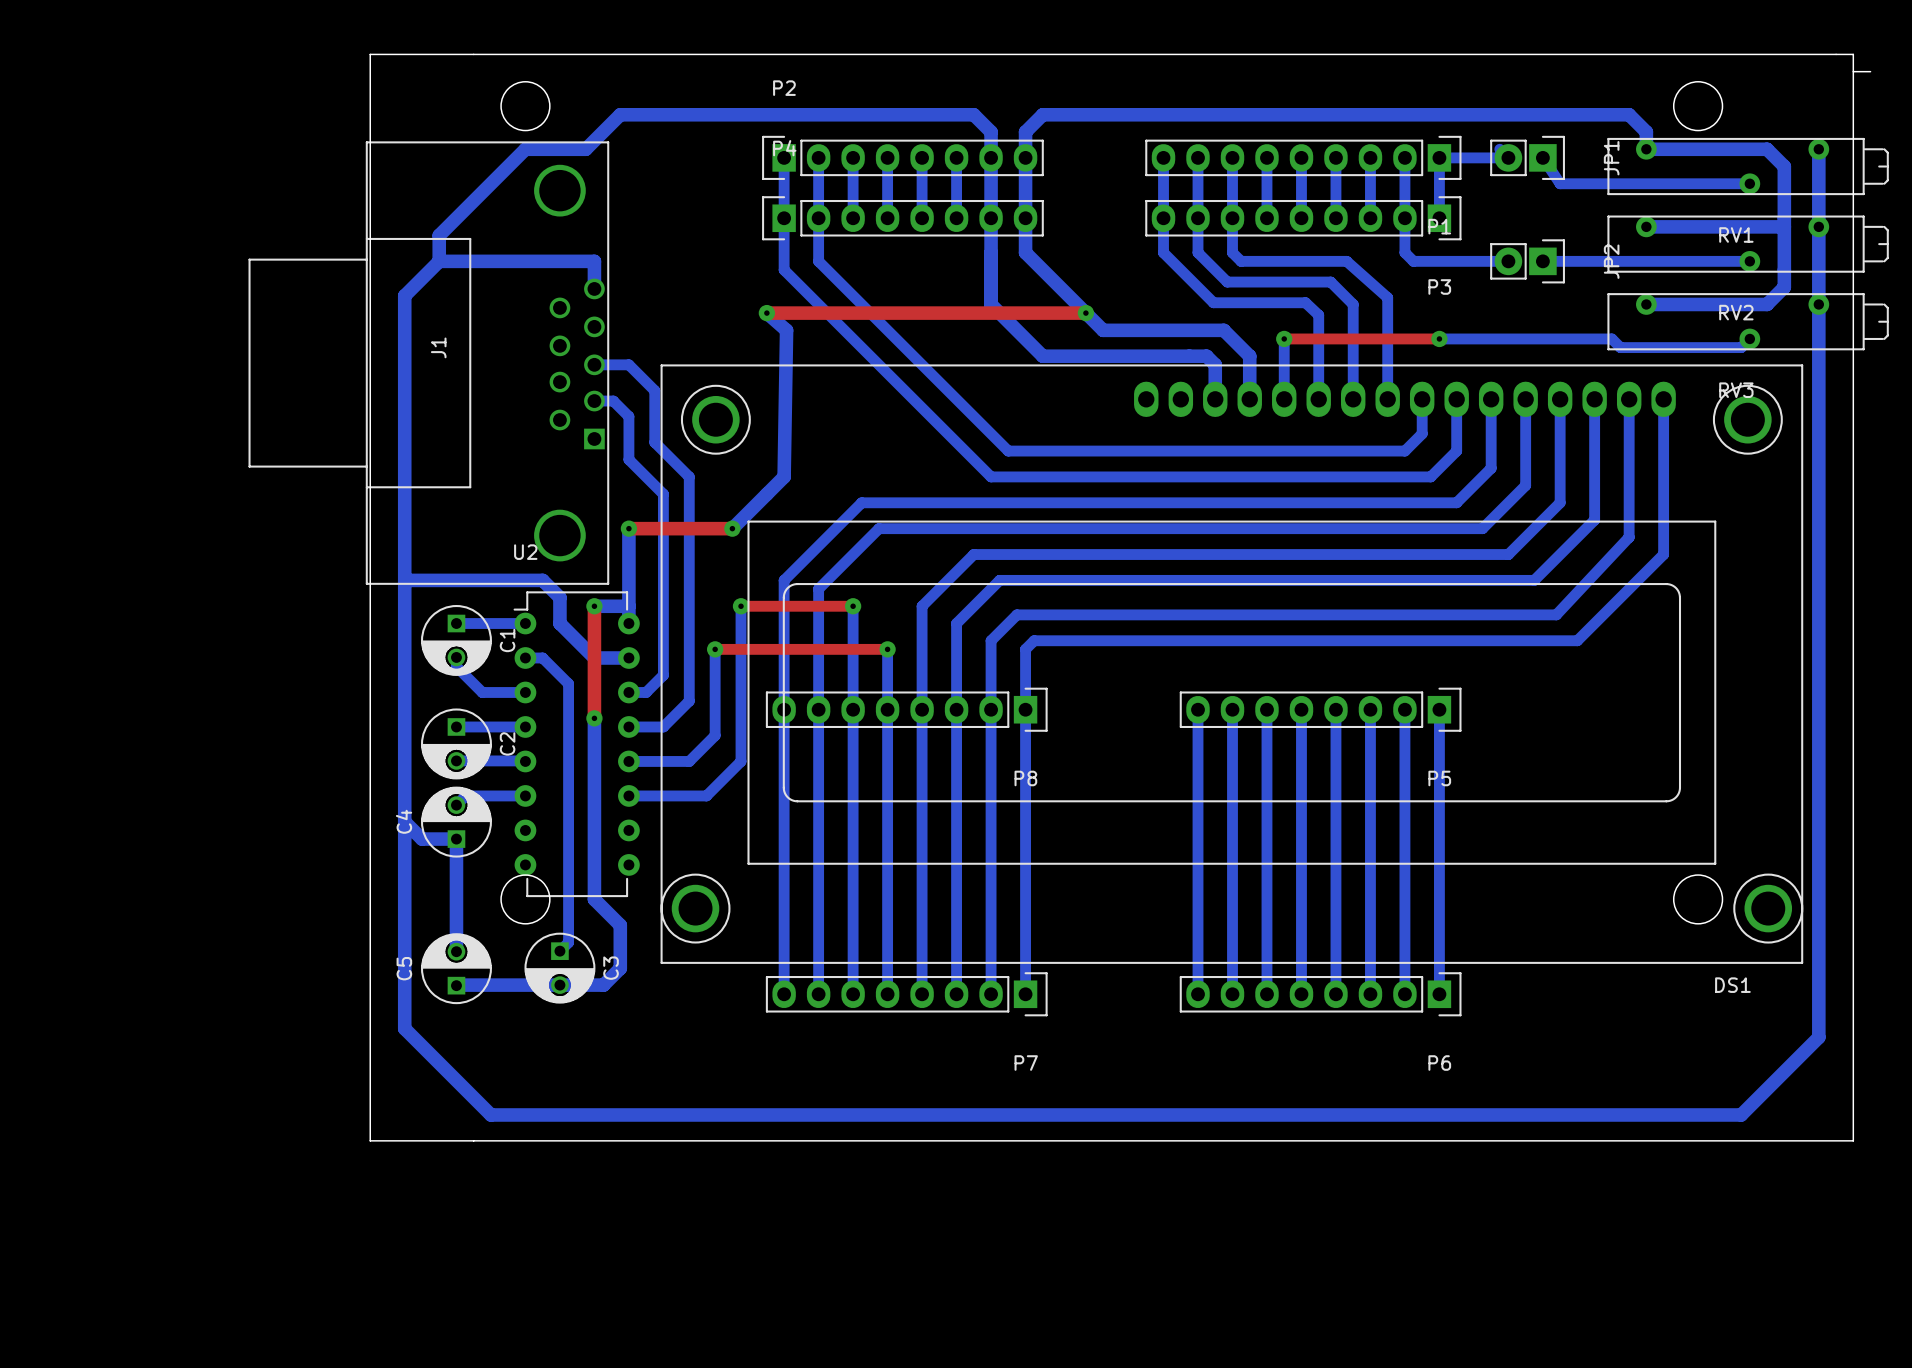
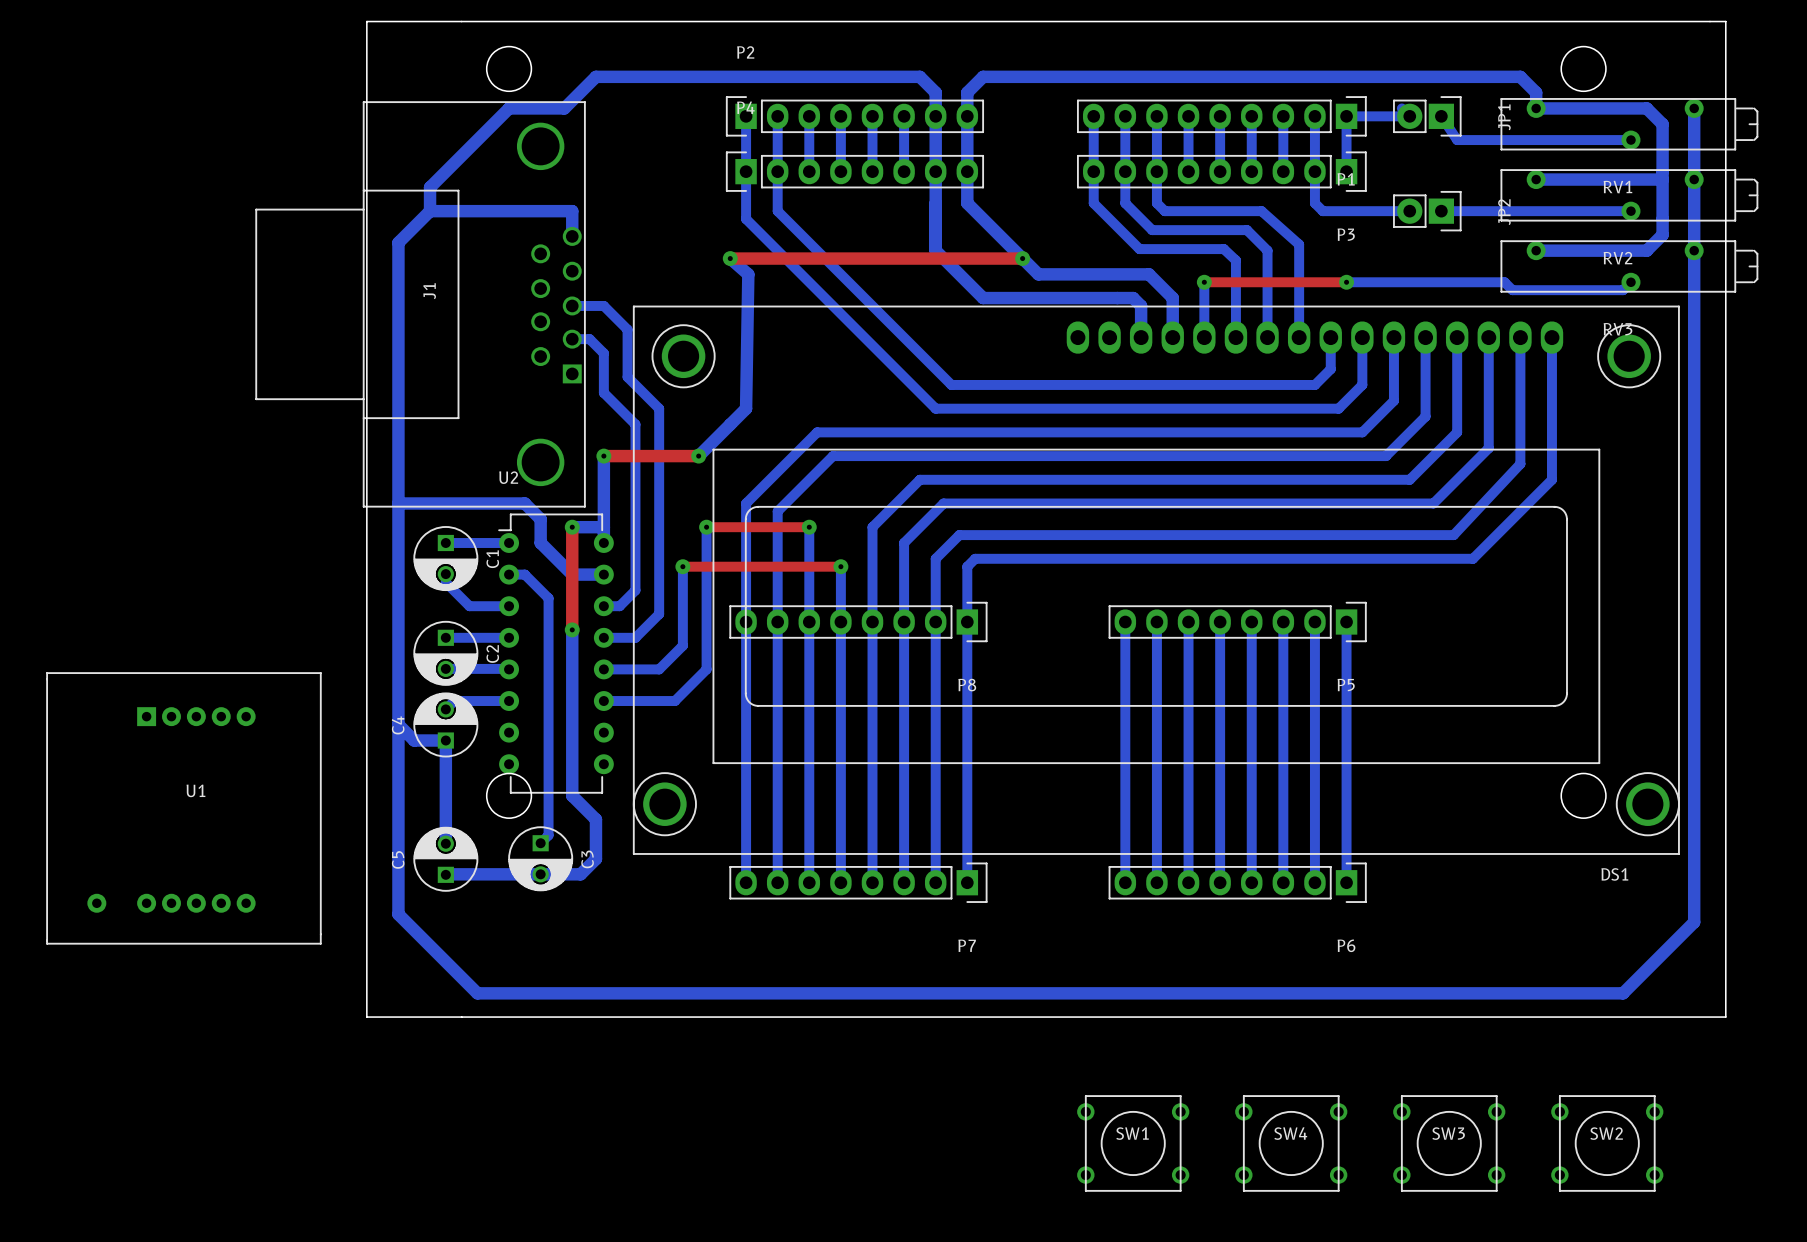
board edge: (1853, 71) (1870, 71) -> none
U1: none -> (183, 808)
SW1: none -> (1133, 1143)
SW4: none -> (1291, 1143)
SW3: none -> (1449, 1143)
SW2: none -> (1607, 1143)

